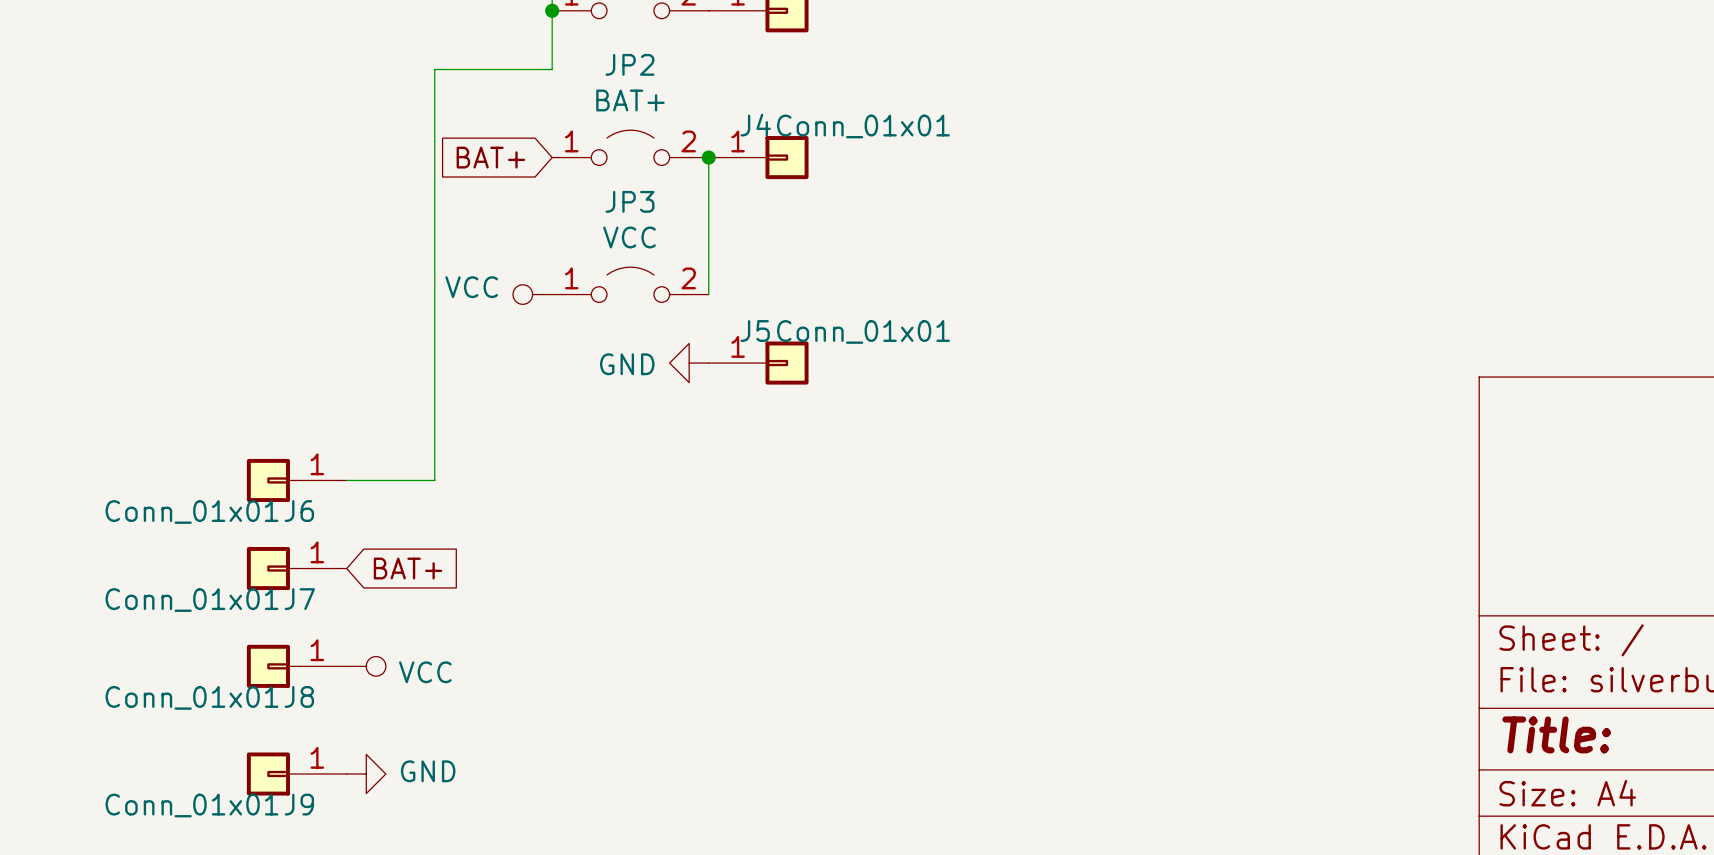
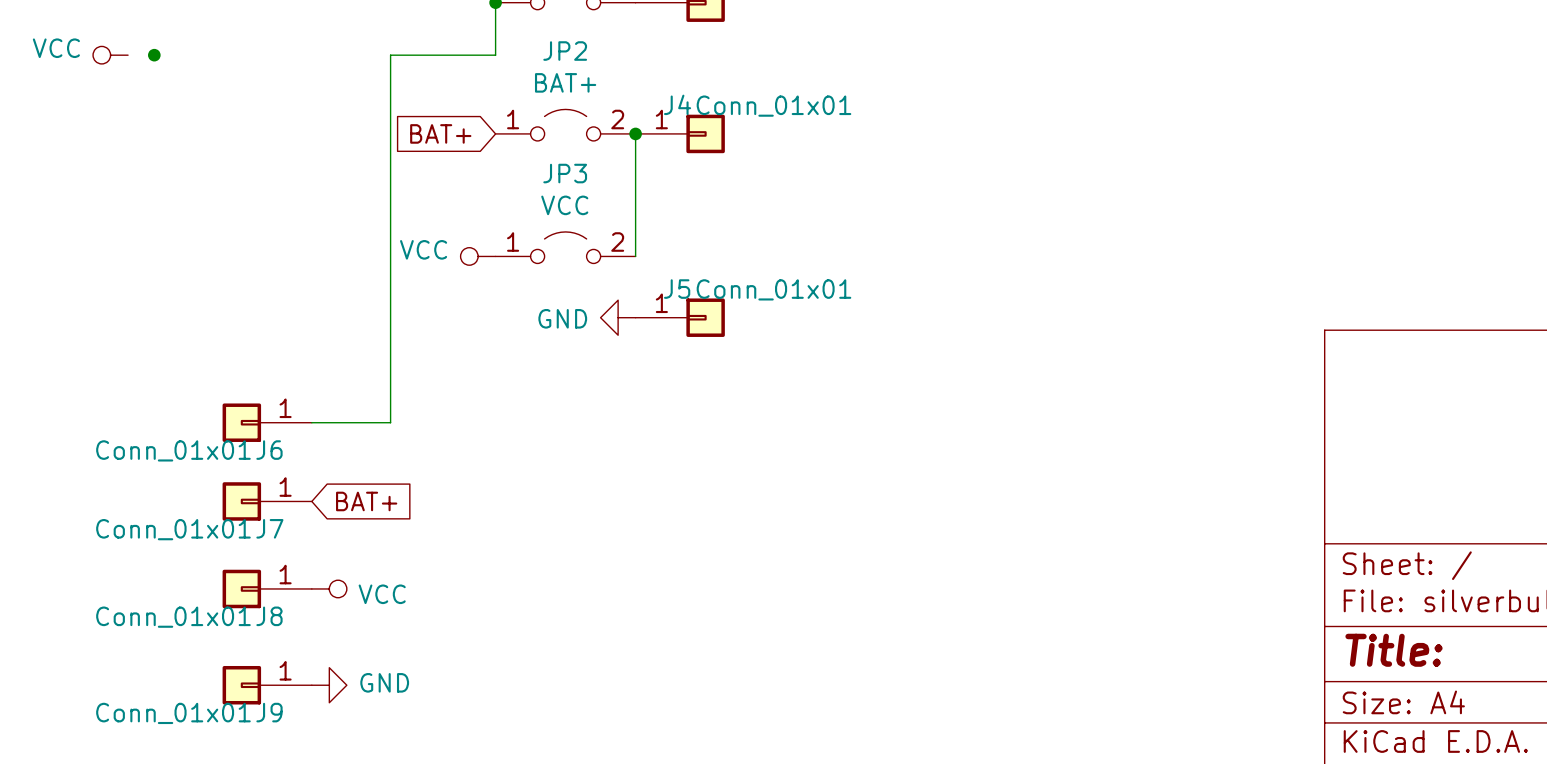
power symbol: none -> VCC (110, 55)
junction: none -> (154, 55)

